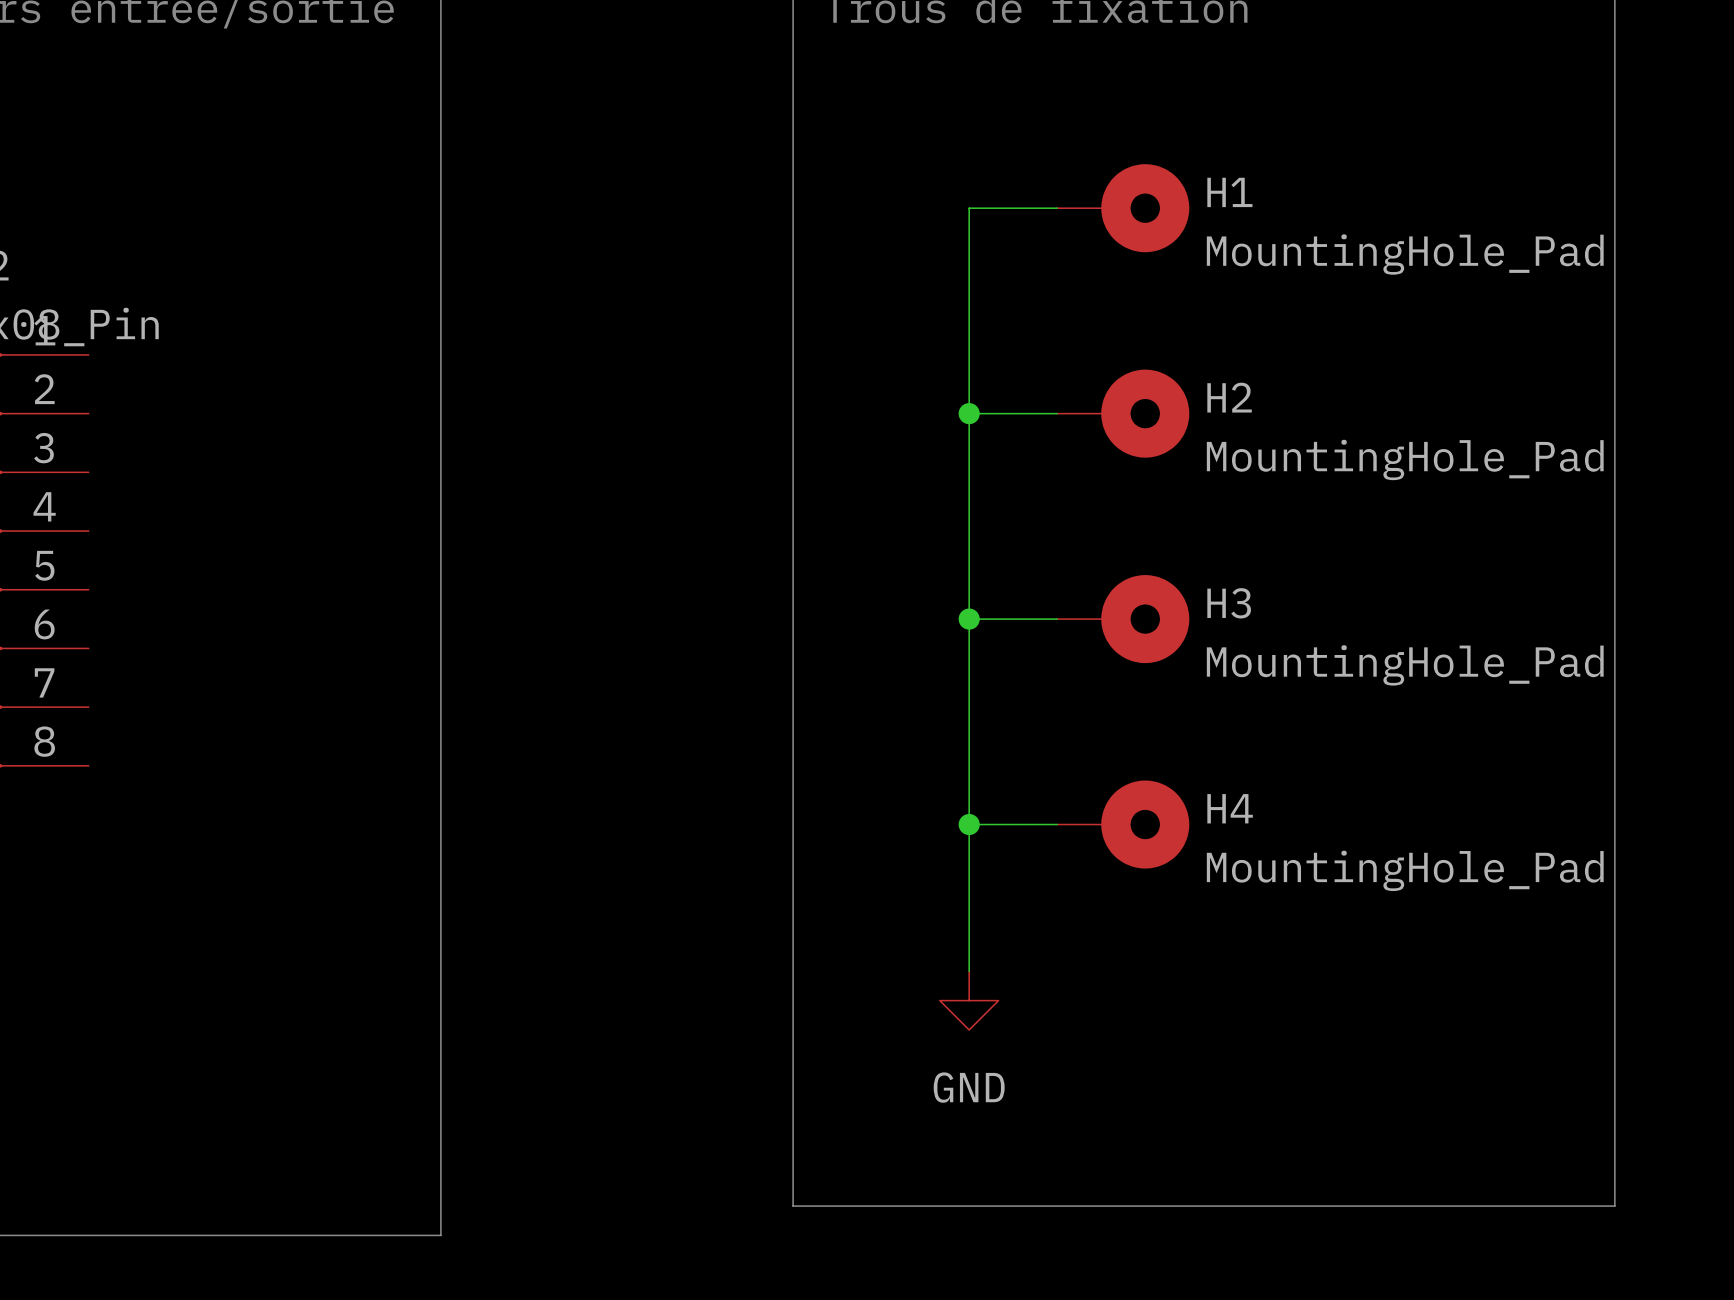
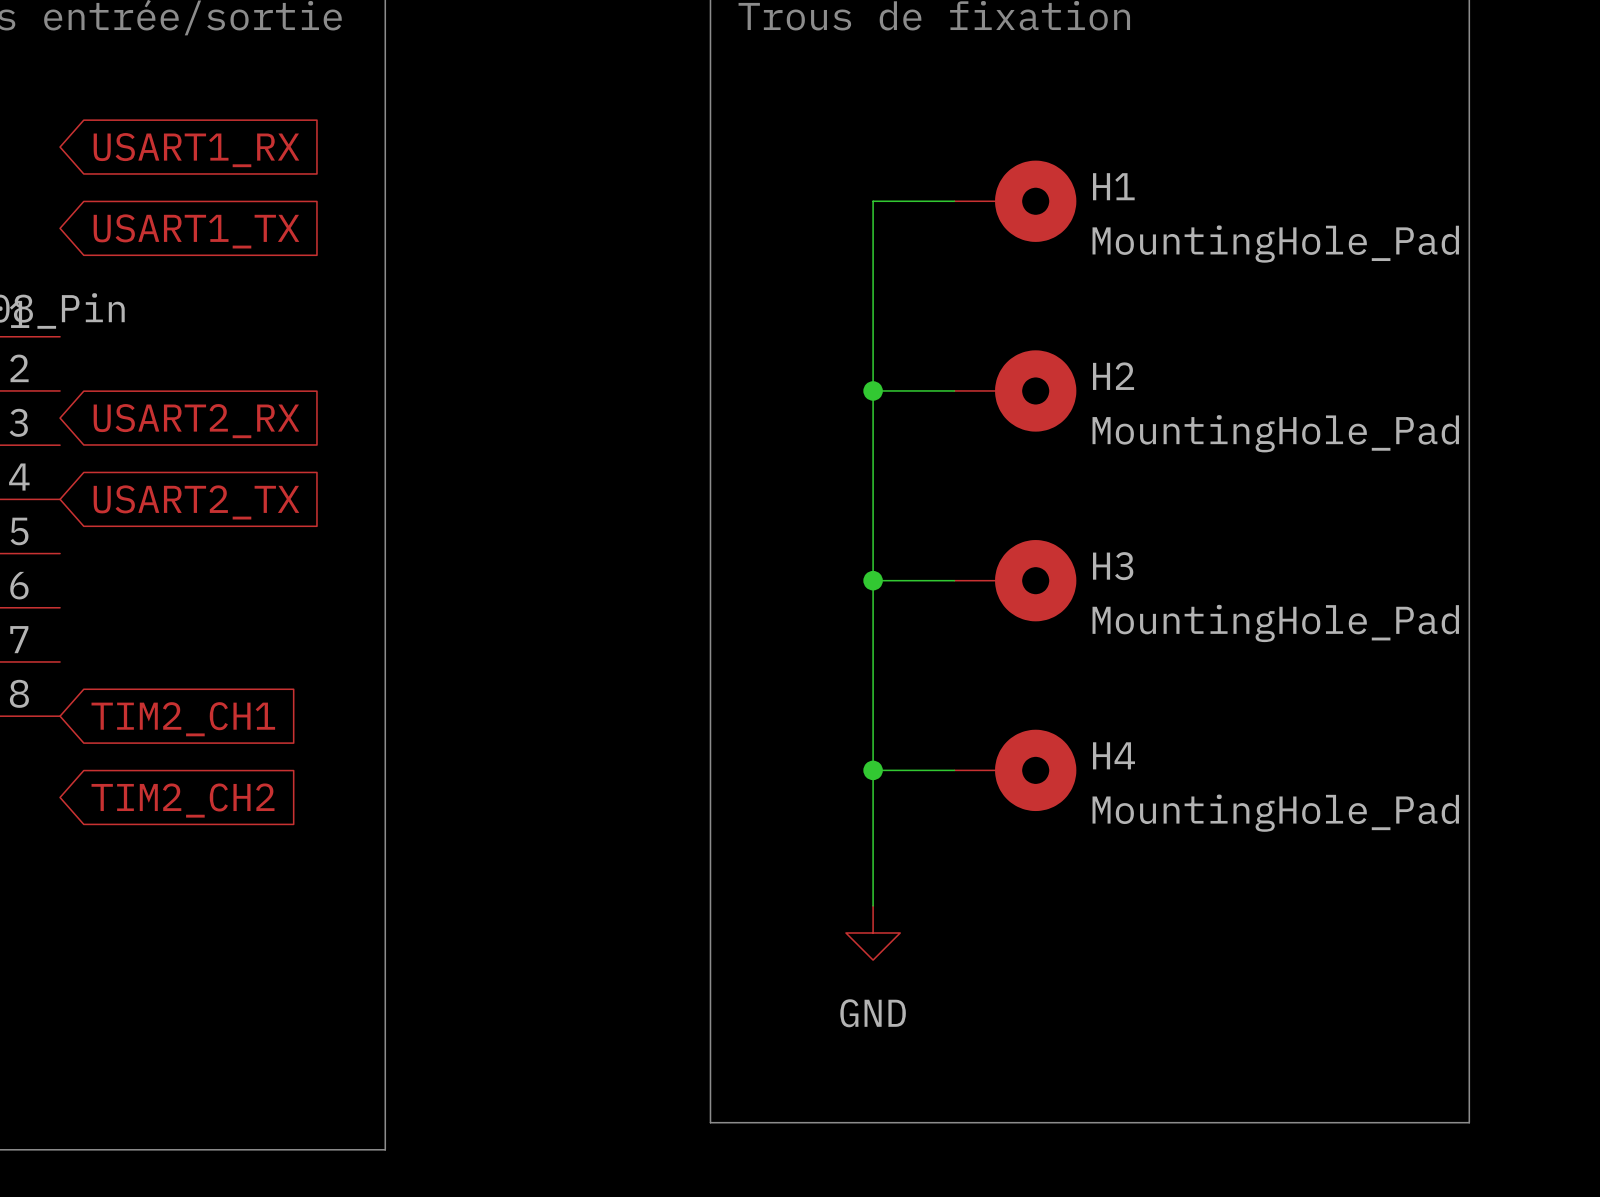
global label: none -> USART1_RX (196, 150)
global label: none -> USART1_TX (196, 231)
global label: none -> USART2_RX (196, 421)
global label: none -> USART2_TX (196, 502)
global label: none -> TIM2_CH1 (183, 719)
global label: none -> TIM2_CH2 (183, 800)

